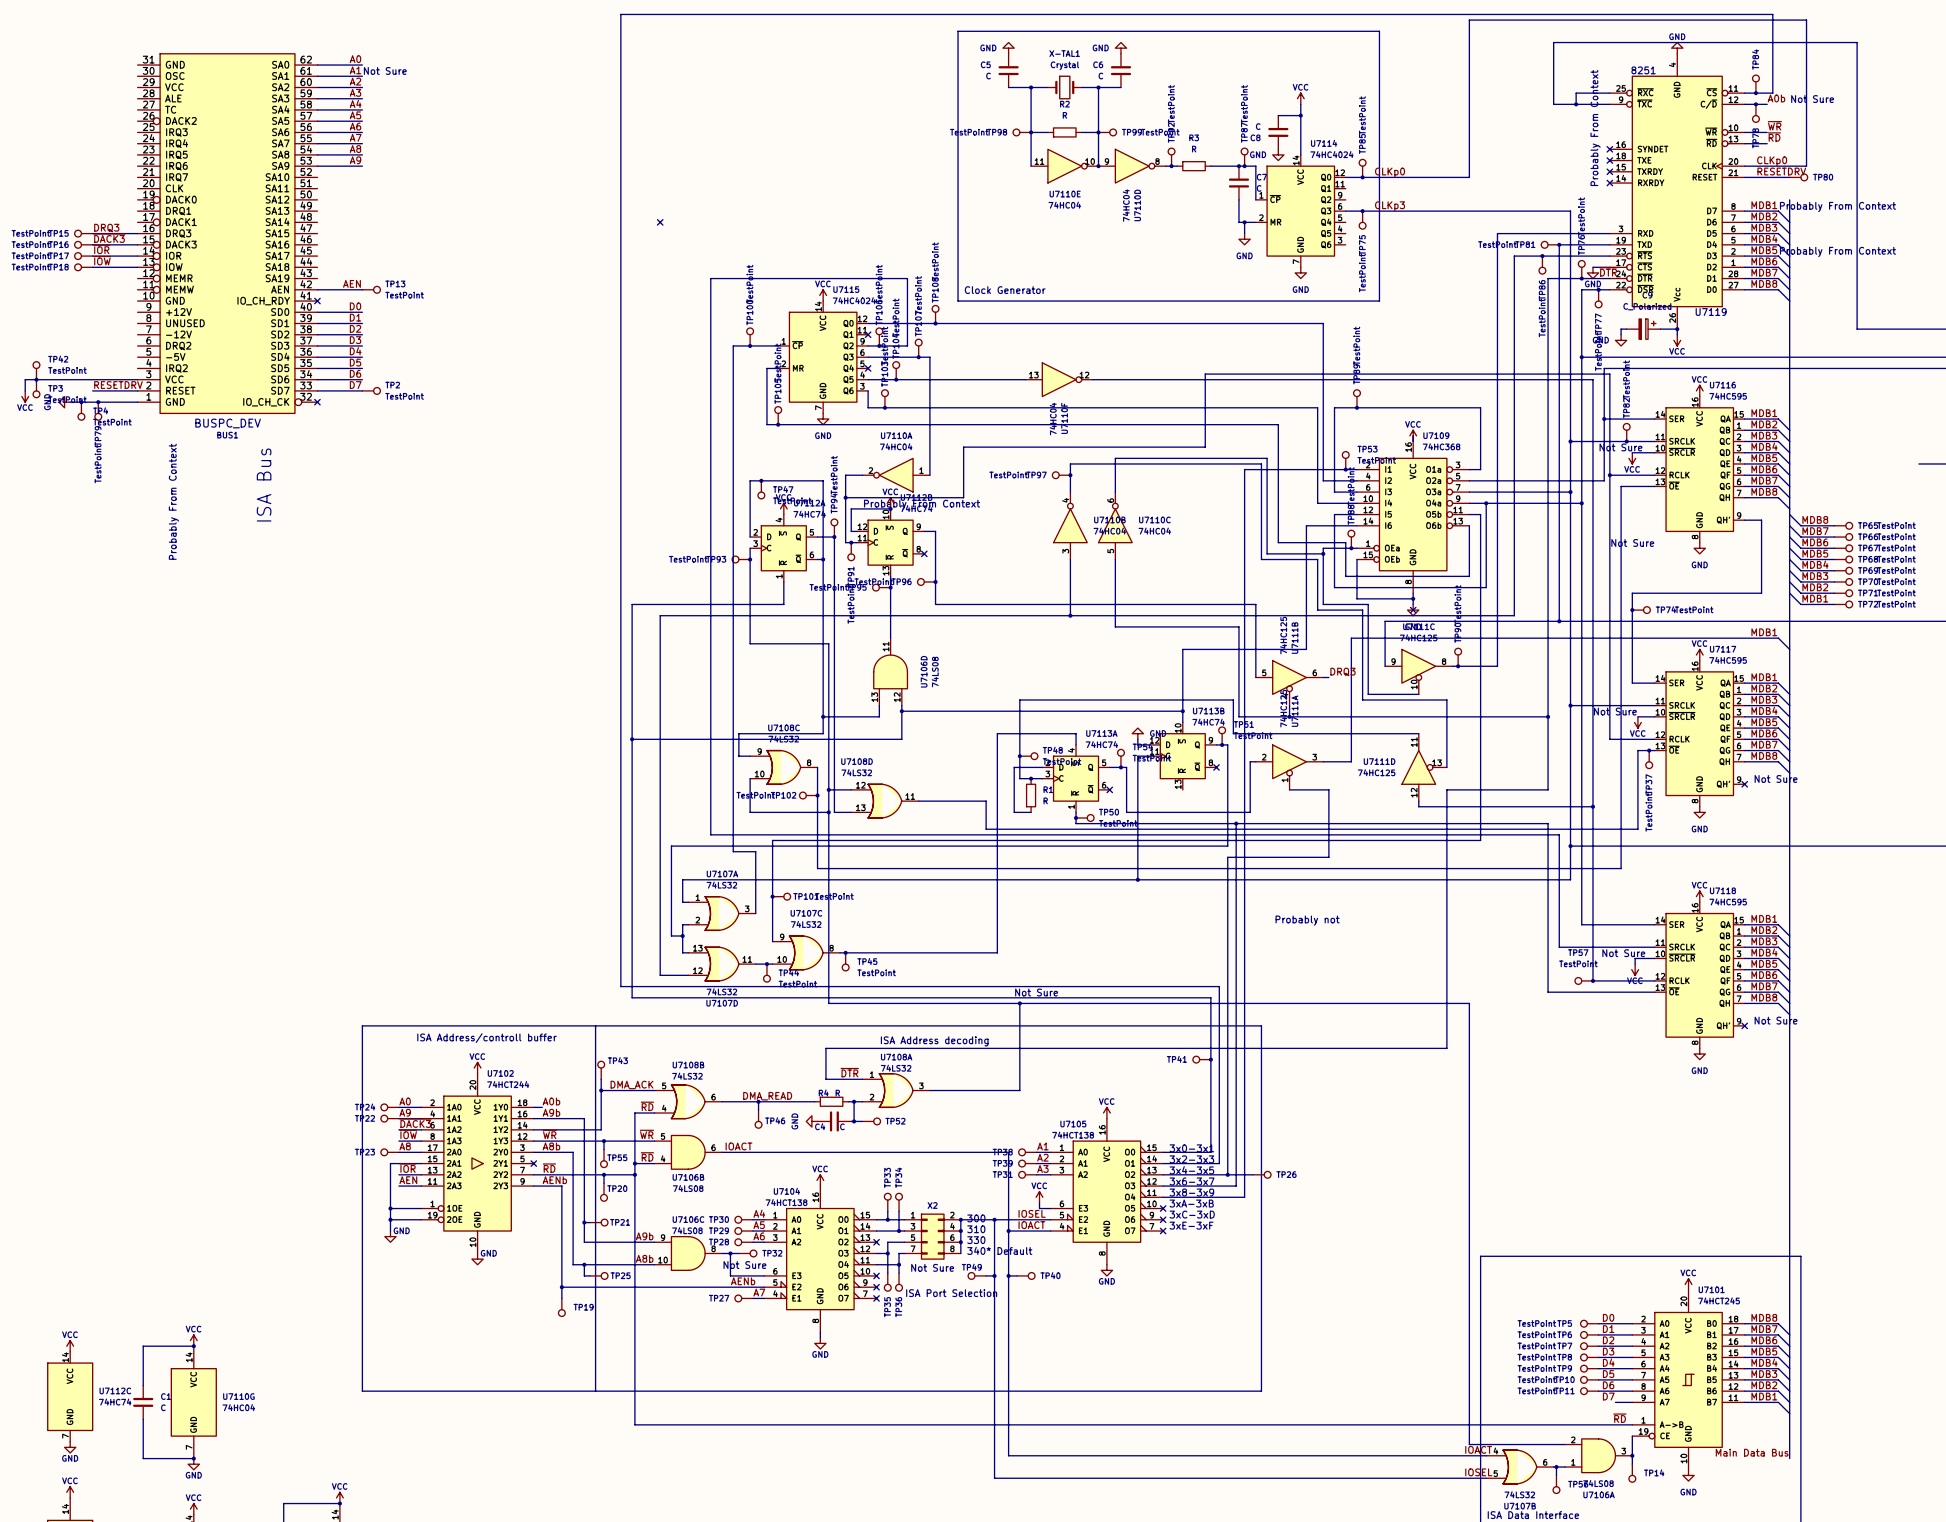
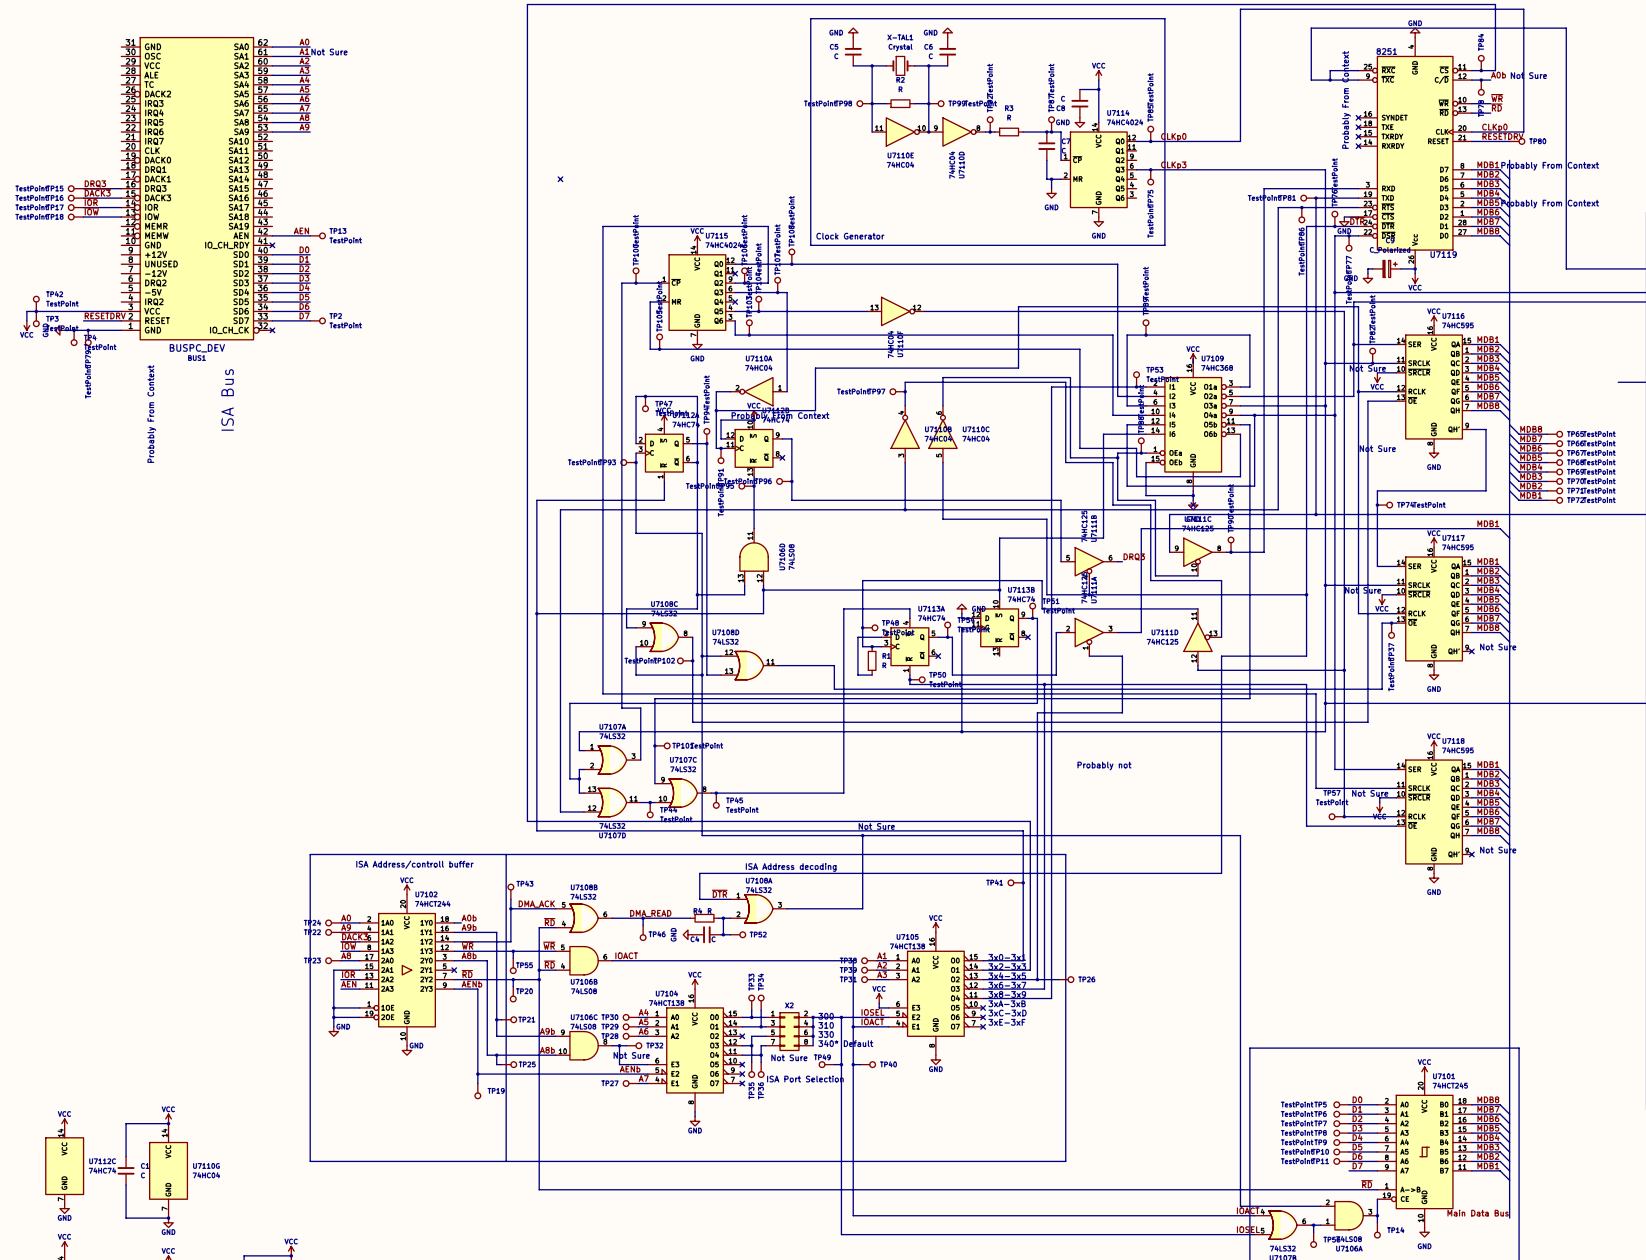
wire: none -> (1349, 1170) (1363, 1170)

